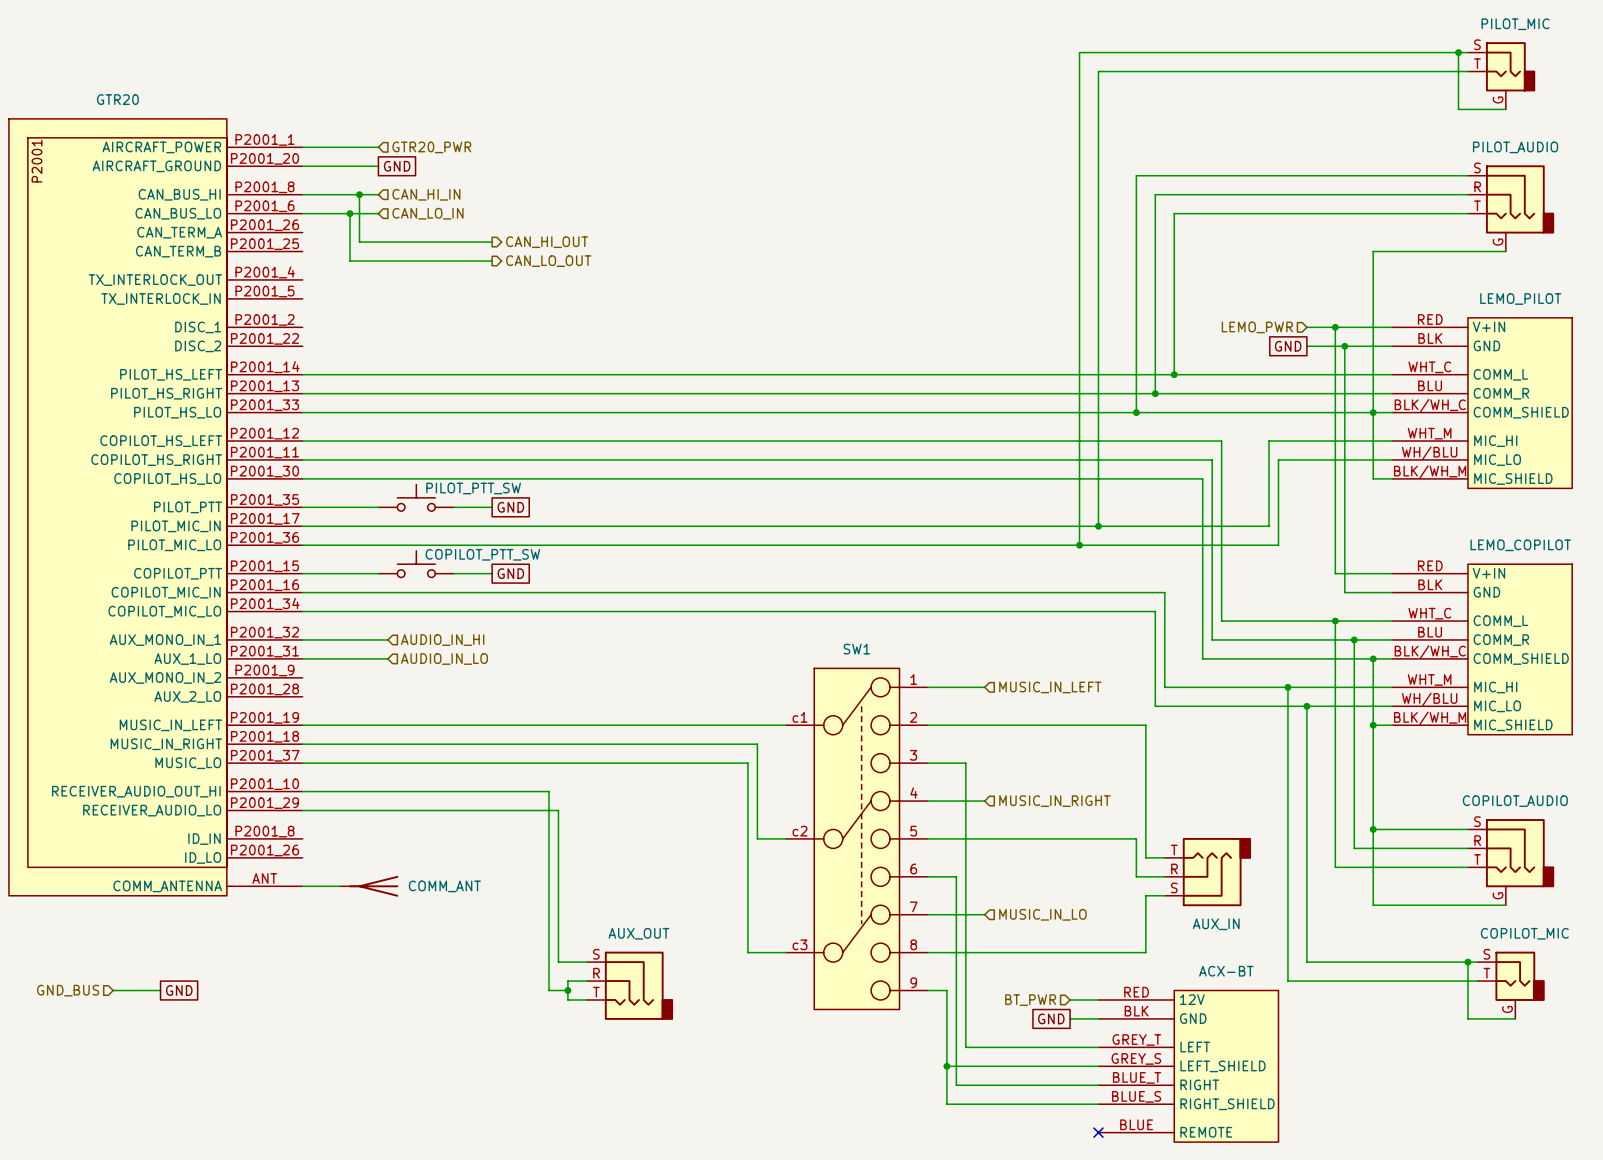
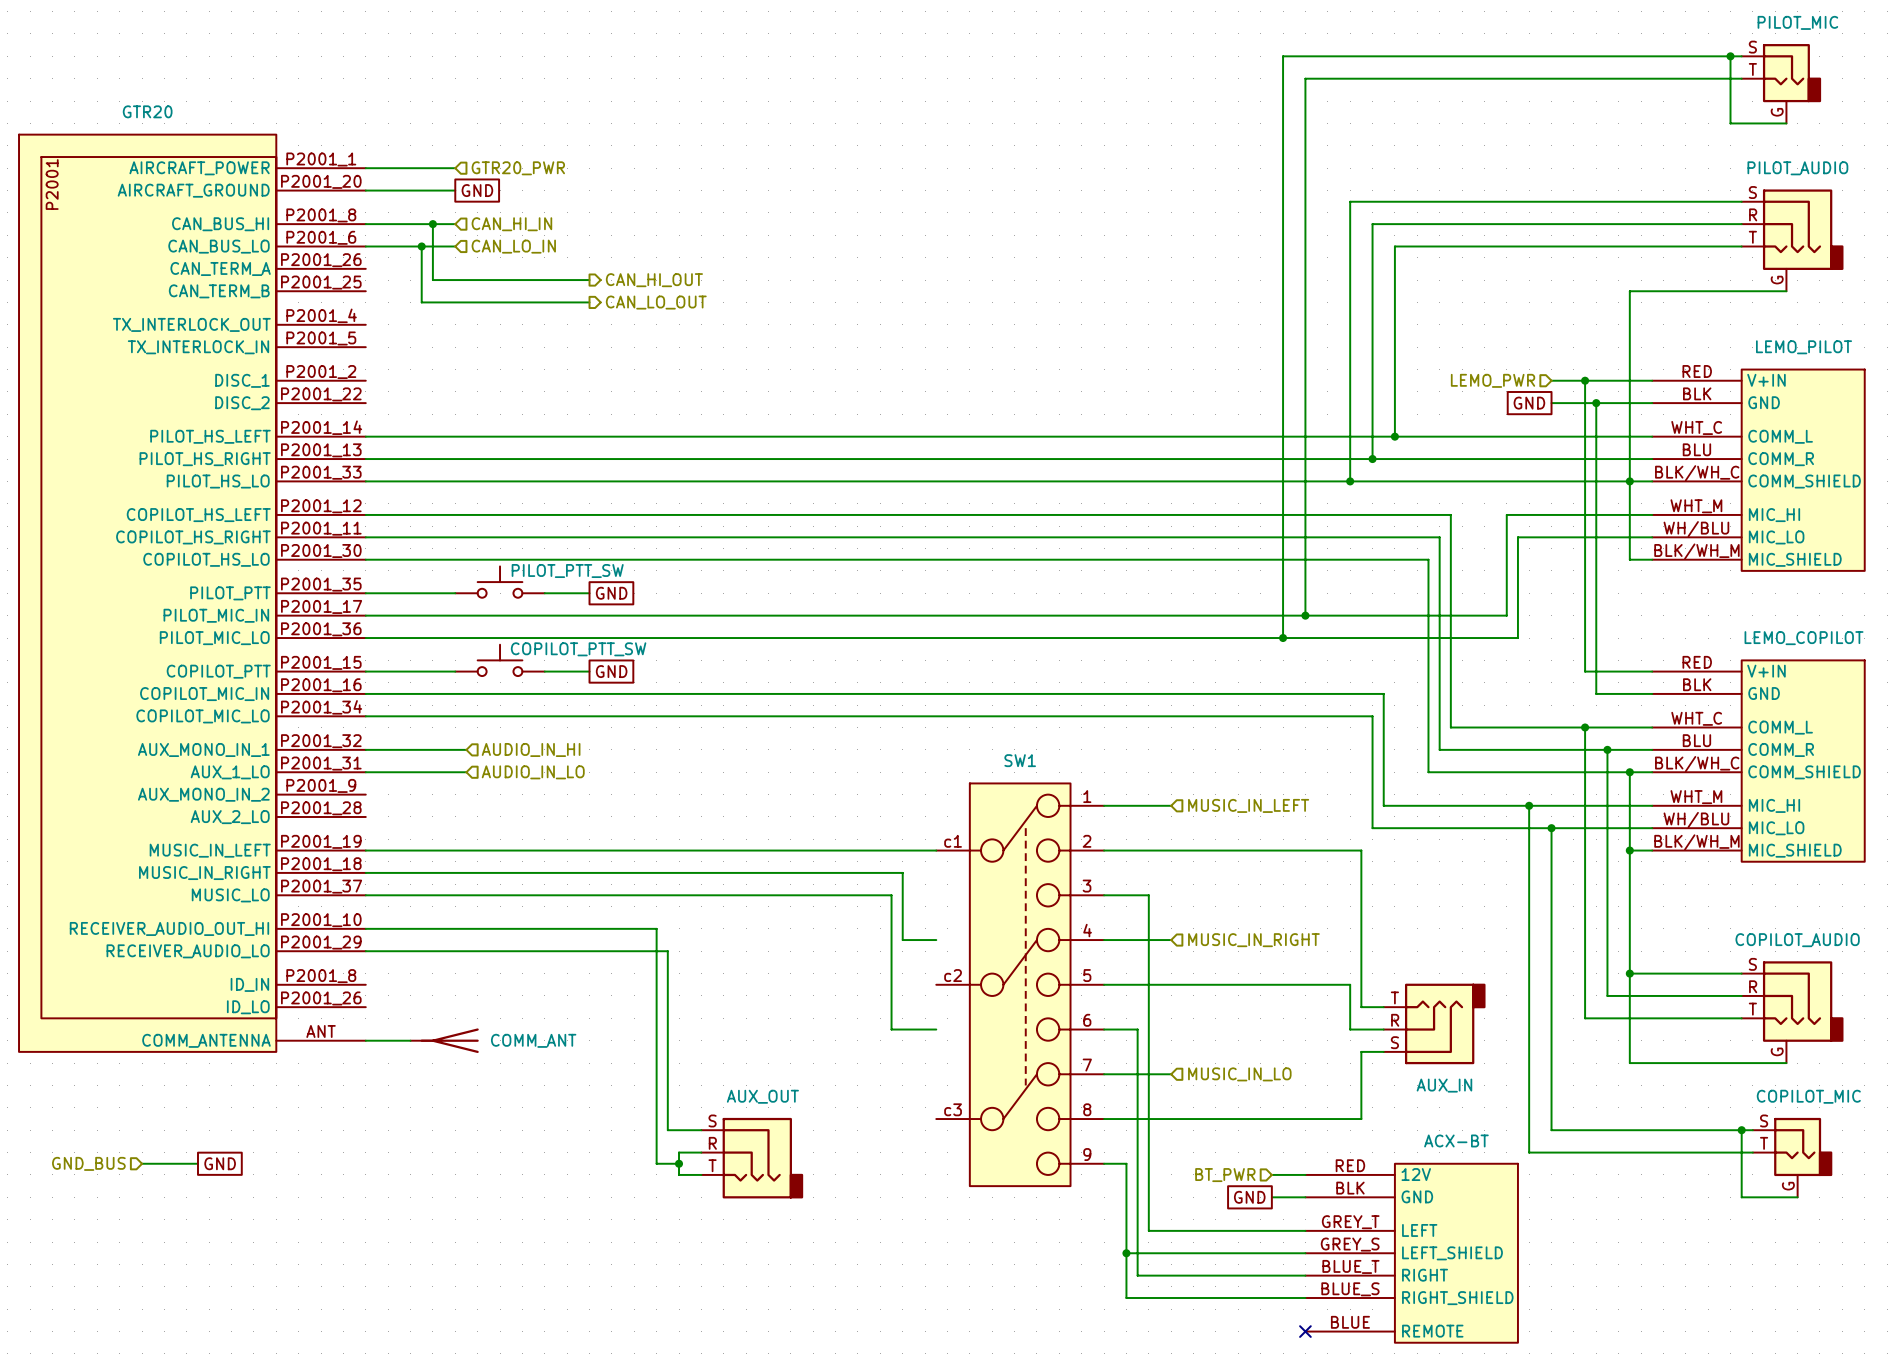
wire: (757, 801) (757, 838) (785, 838) -> (902, 940) (936, 940)
wire: (747, 876) (747, 952) (785, 952) -> (891, 1029) (936, 1029)

